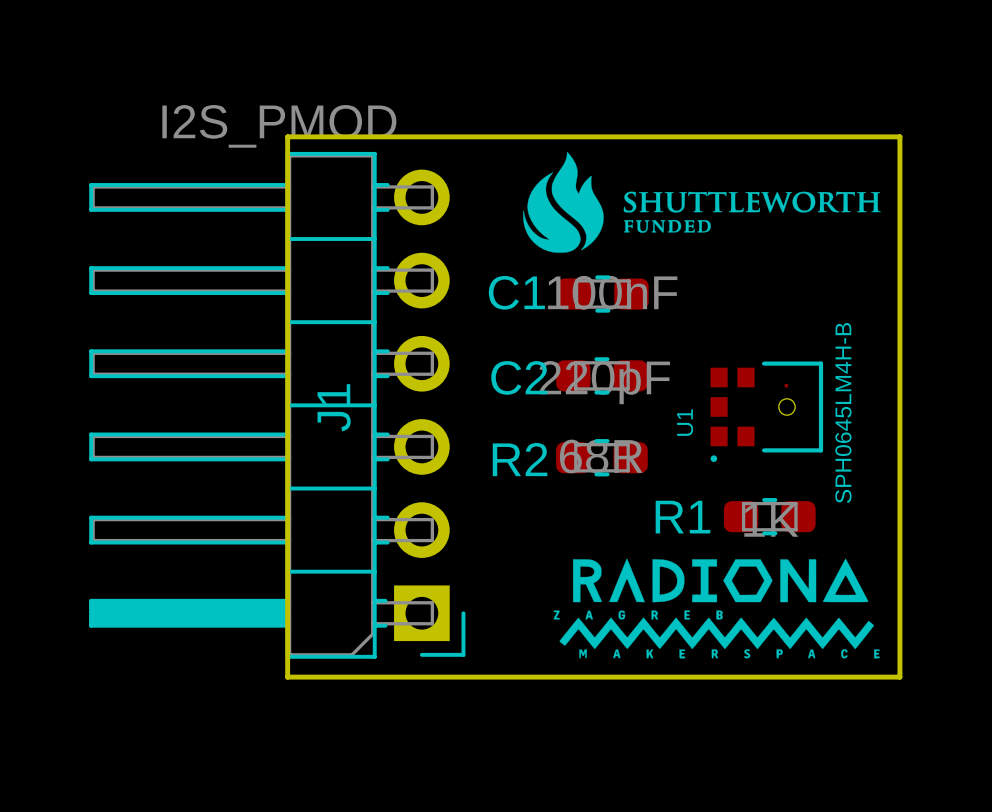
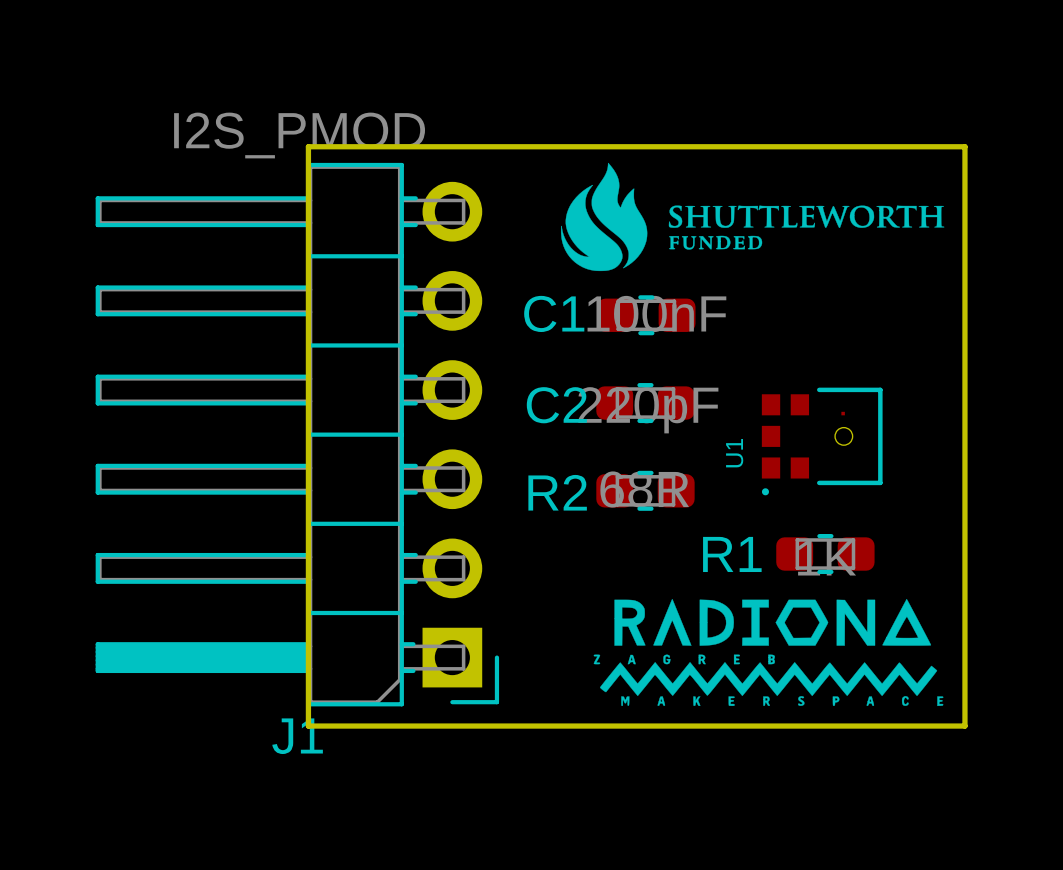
J1 name rotation: 0° (334, 407) -> 90° clockwise (297, 736)
J1 name position: J1 (334, 407) -> J1 (297, 736)
U1 value: SPH0645LM4H-B (843, 413) -> none

